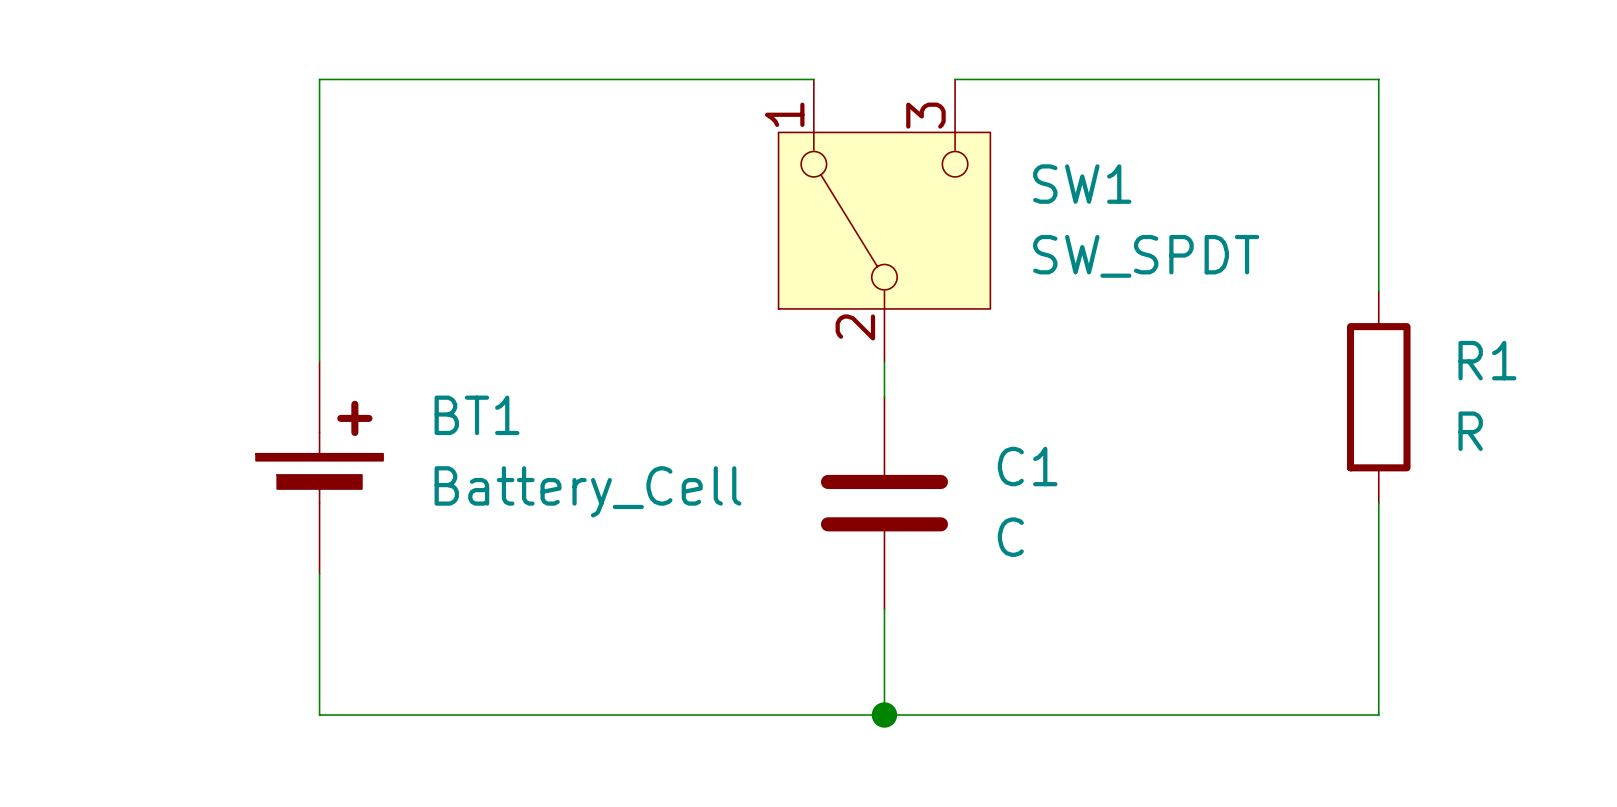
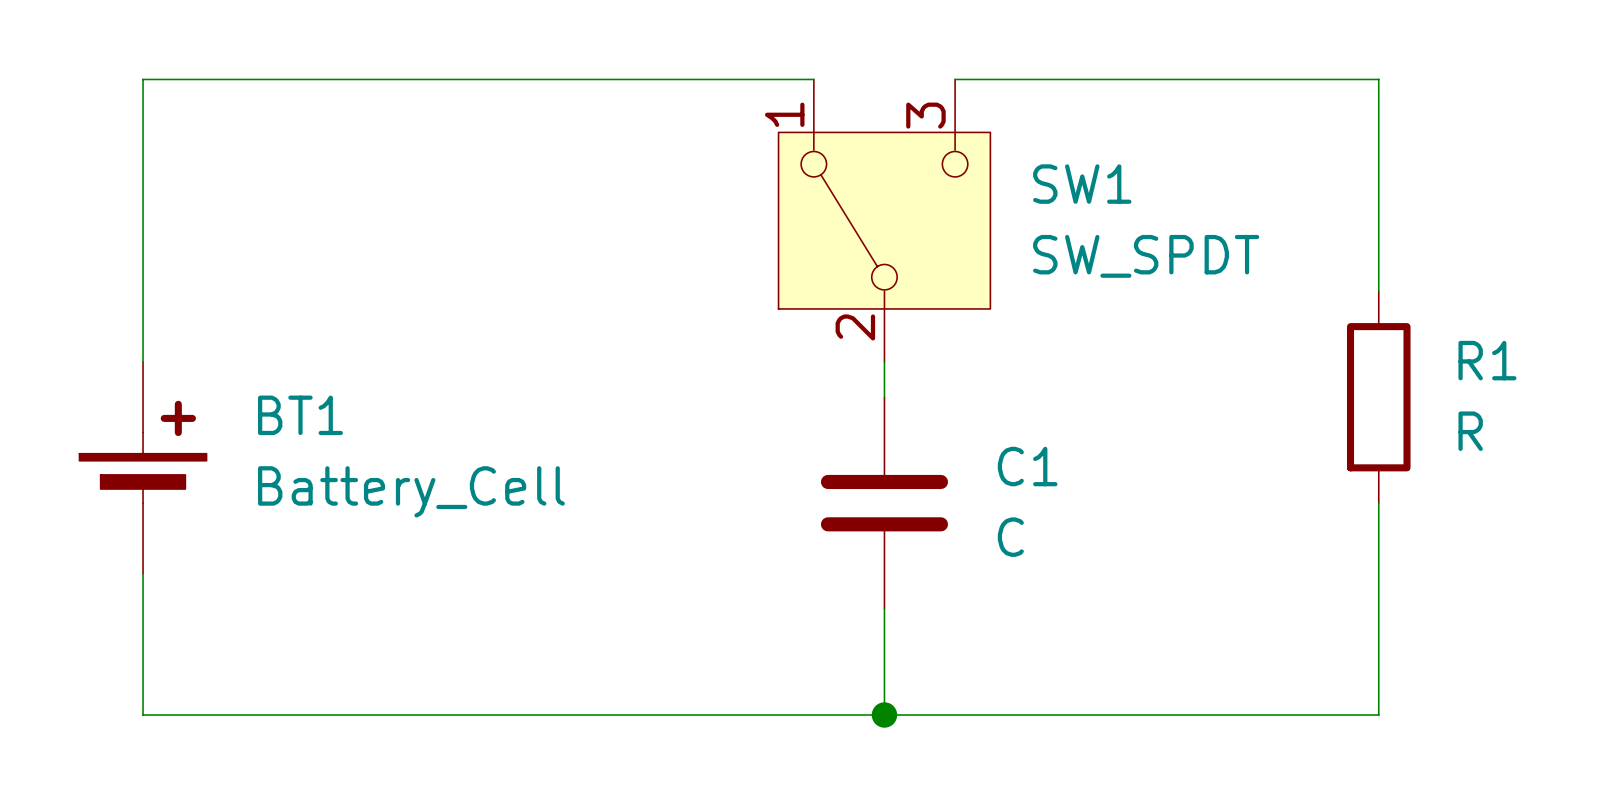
wire: (319, 79) (319, 361) -> (319, 79) (143, 79) (143, 361)
BT1 position: (319, 467) -> (143, 467)
wire: (319, 573) (319, 714) -> (143, 573) (143, 714) (319, 714)

